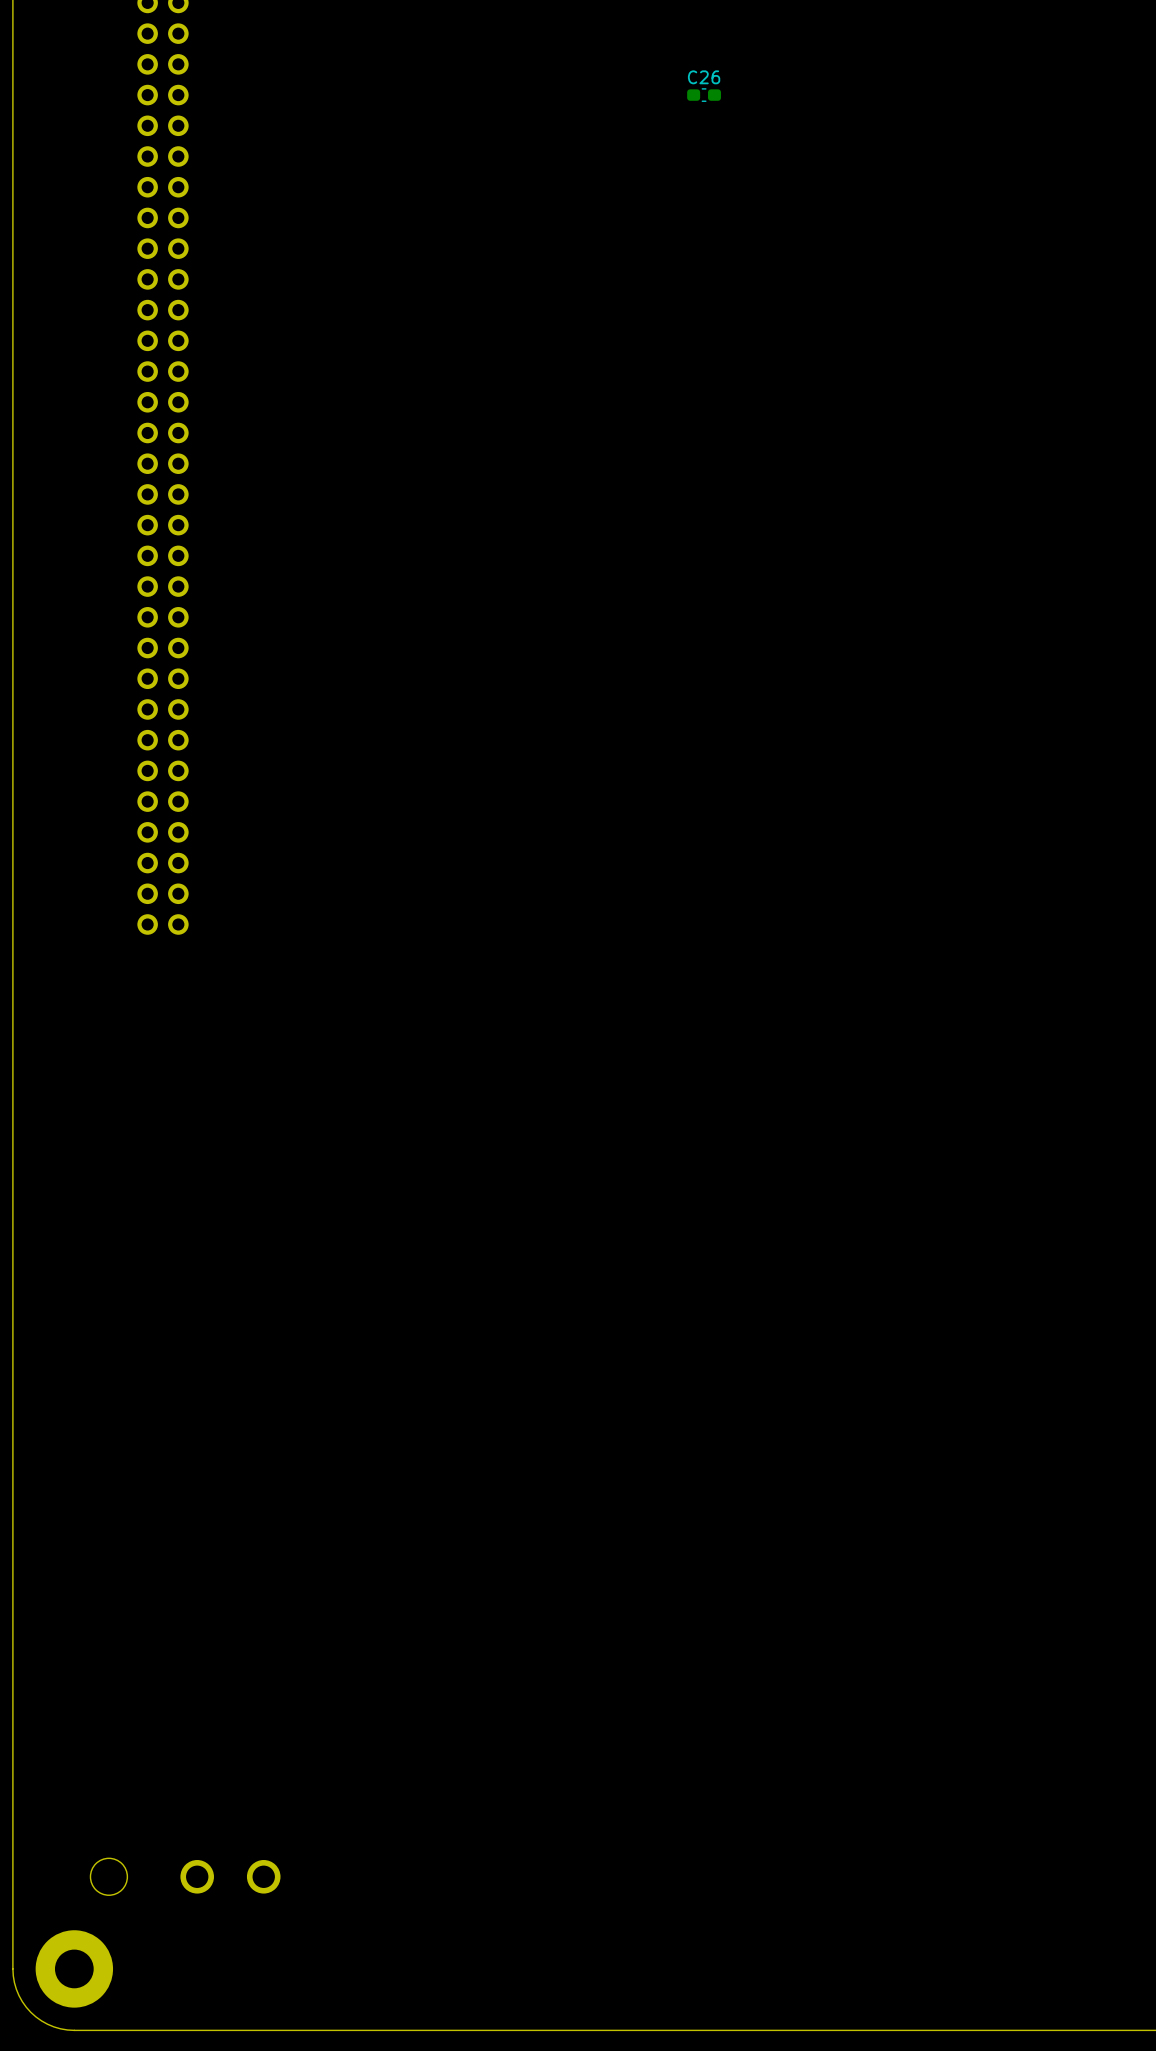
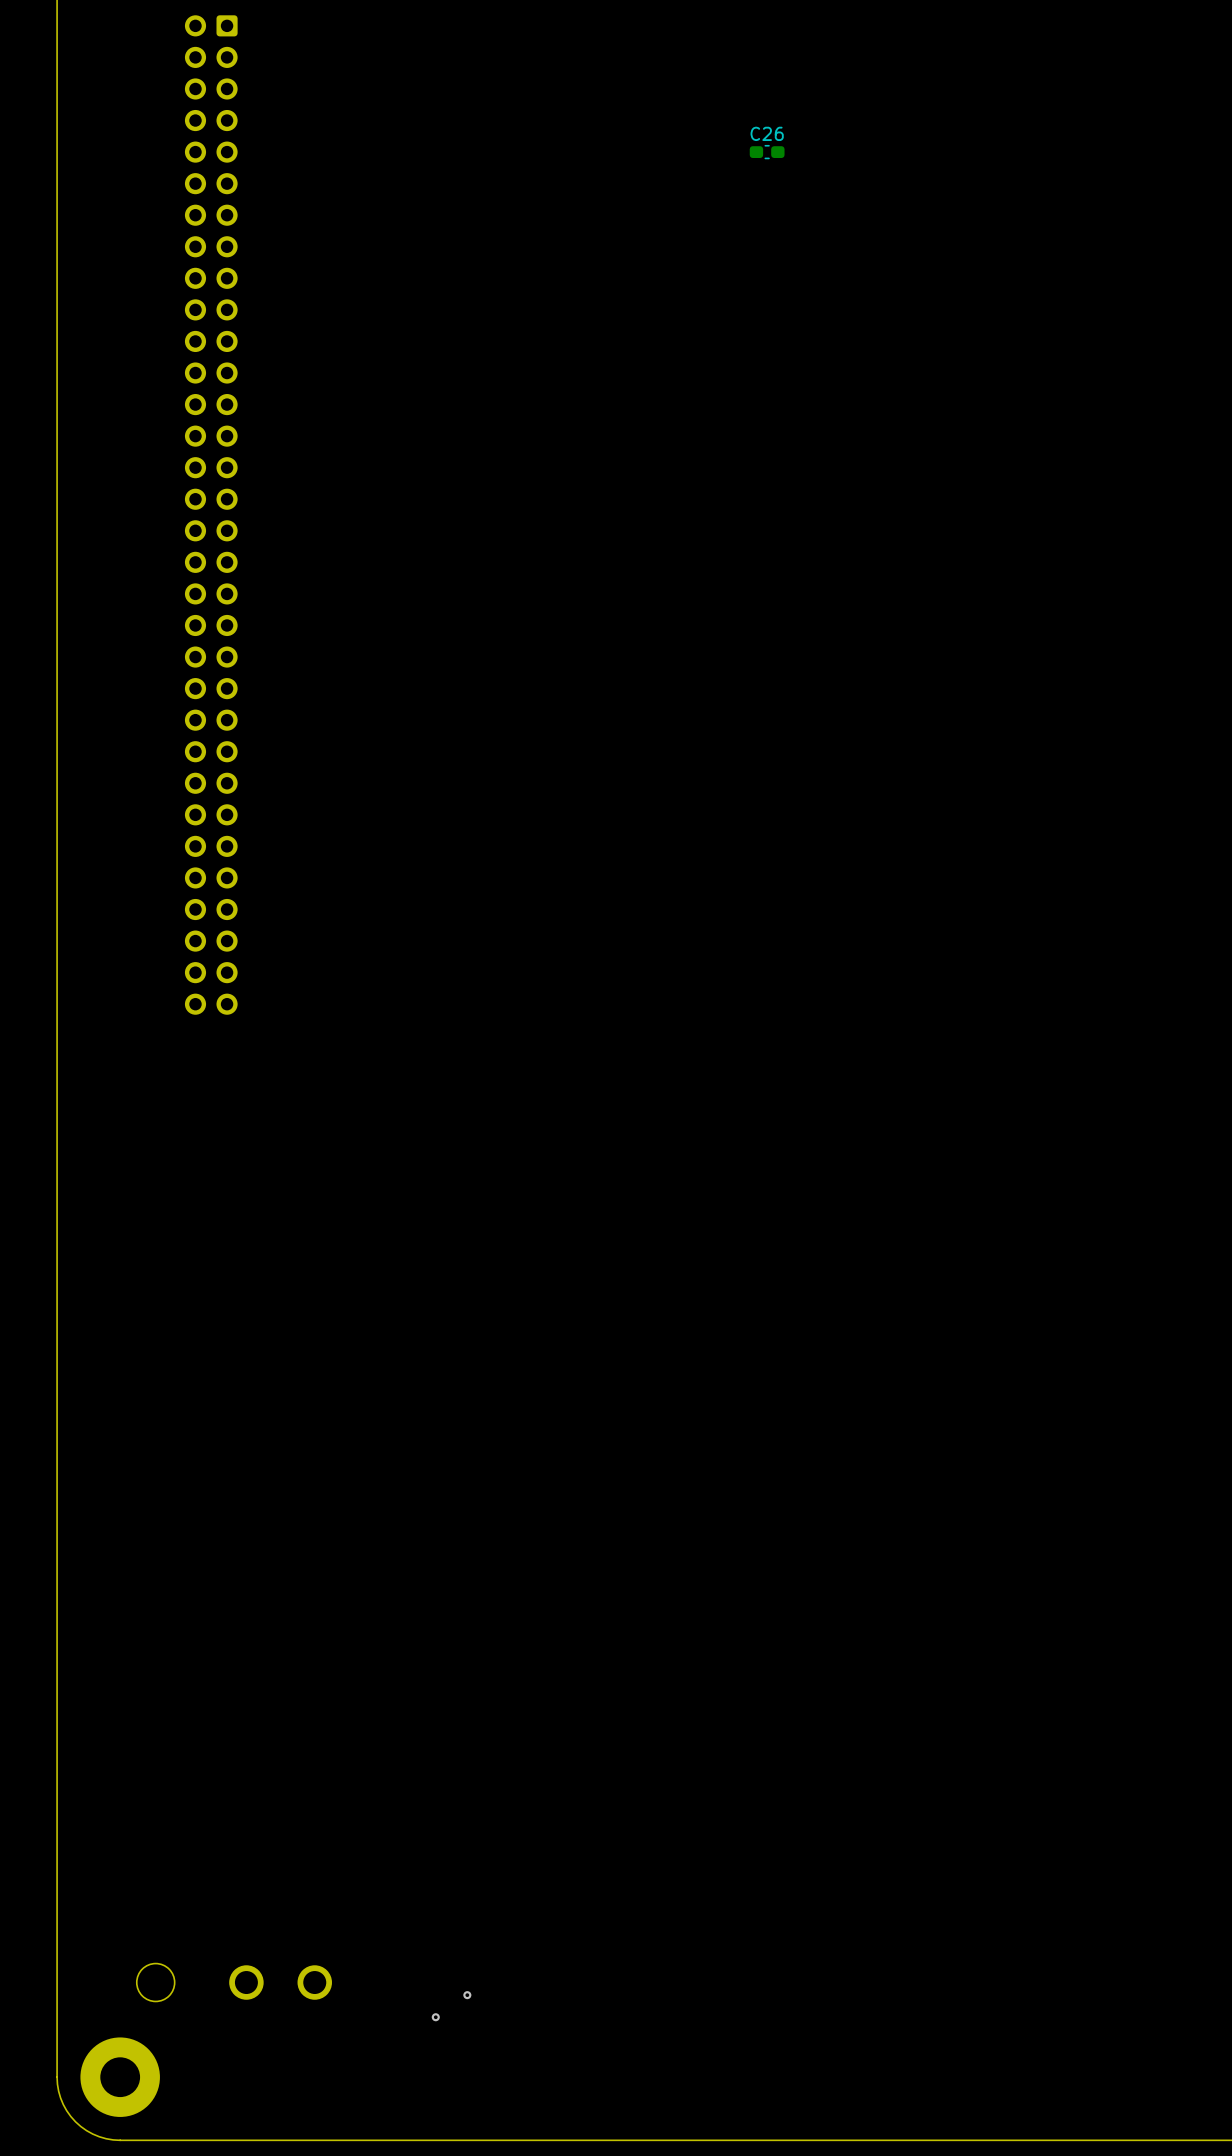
via: none -> (467, 1995)
via: none -> (435, 2017)

